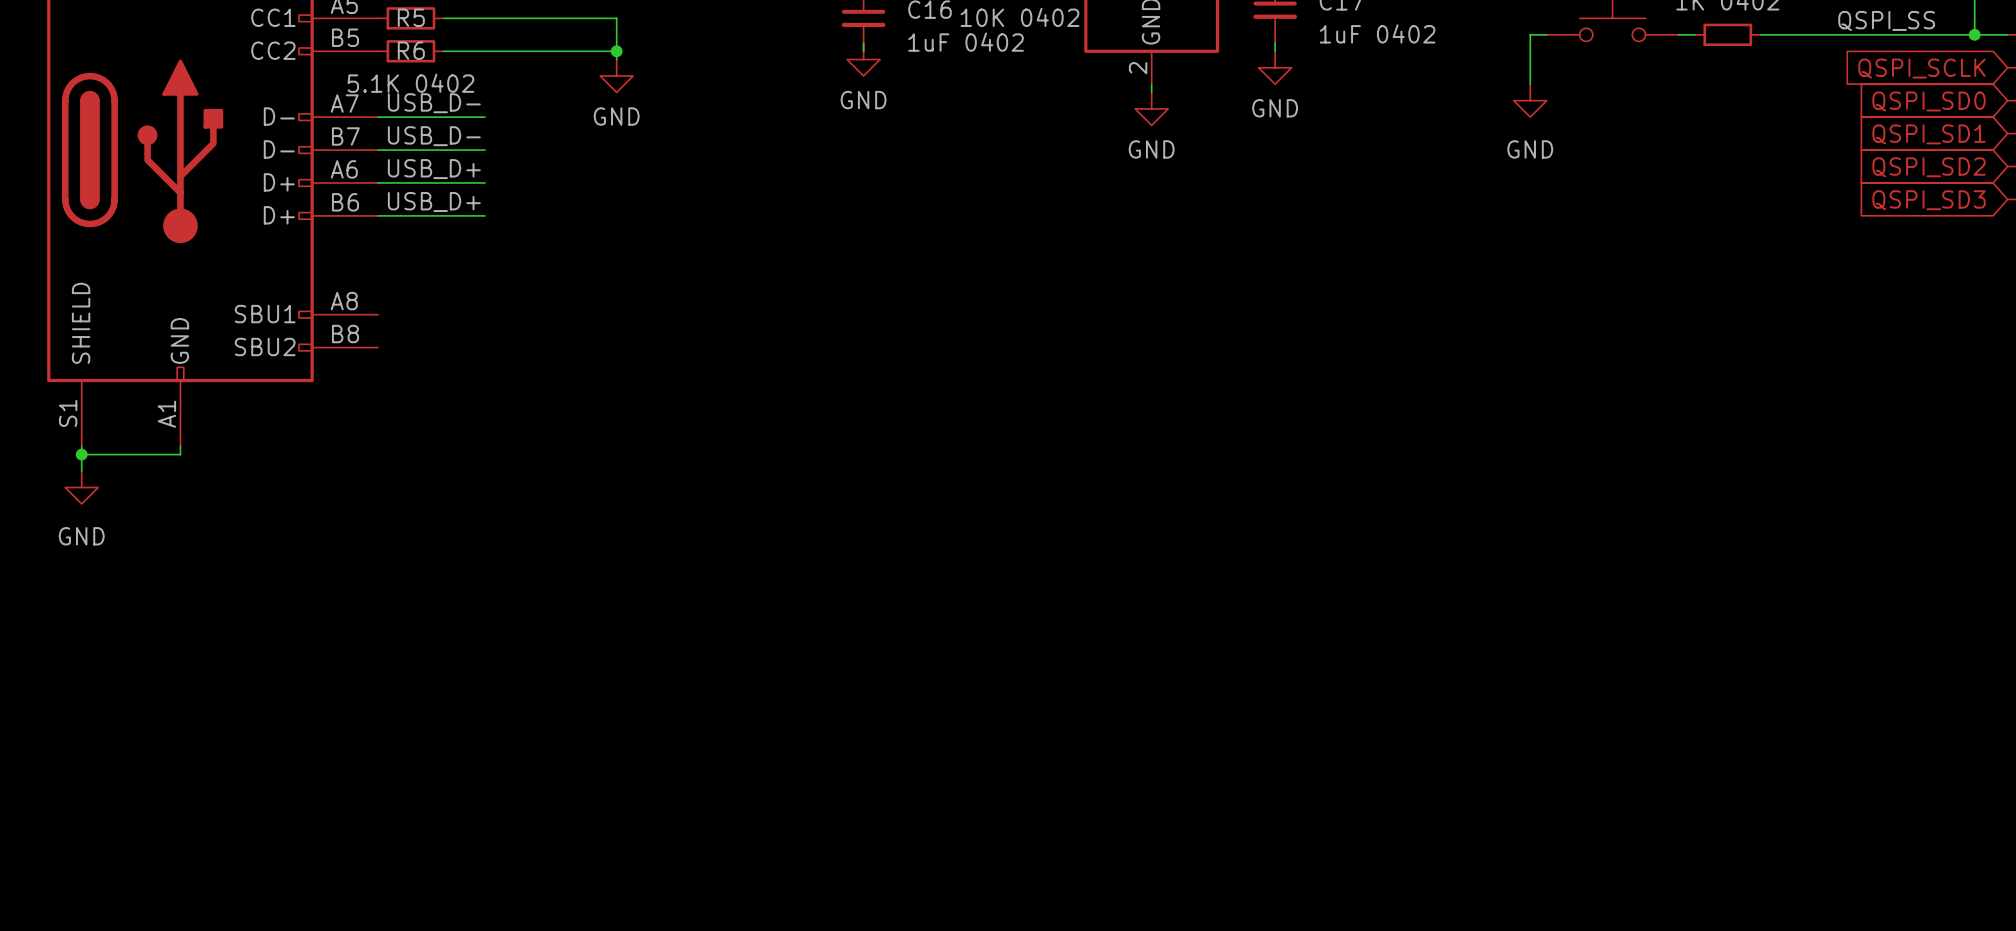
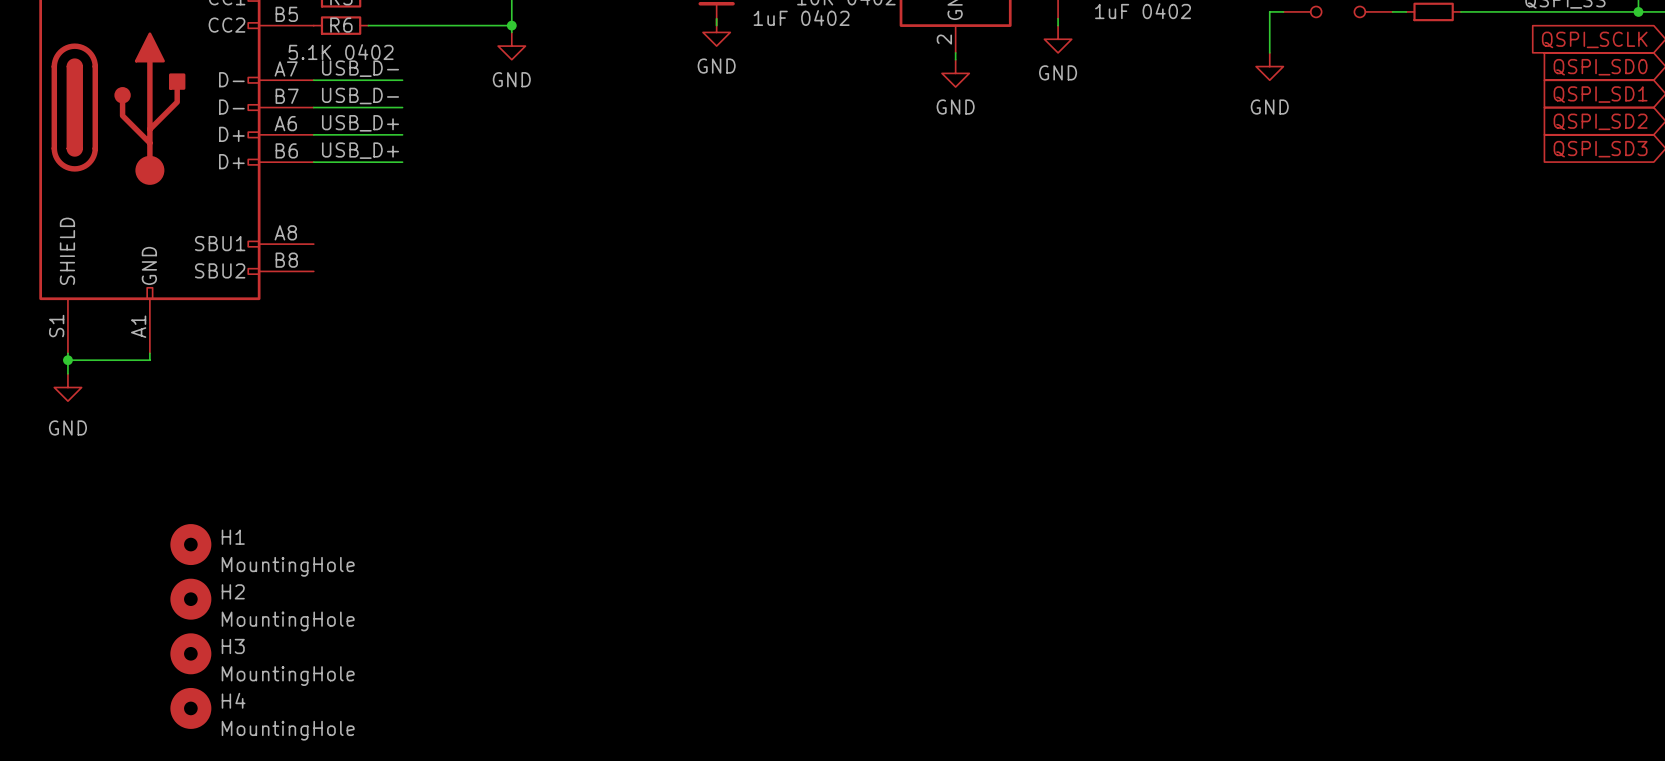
H1: none -> MountingHole (190, 544)
H2: none -> MountingHole (190, 599)
H3: none -> MountingHole (190, 653)
H4: none -> MountingHole (190, 708)

